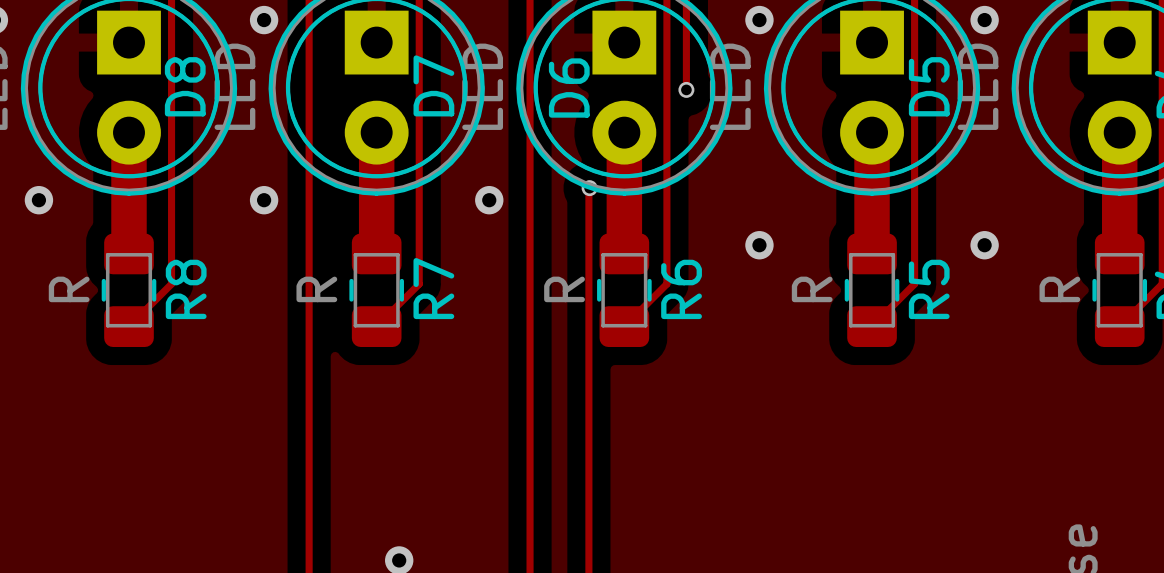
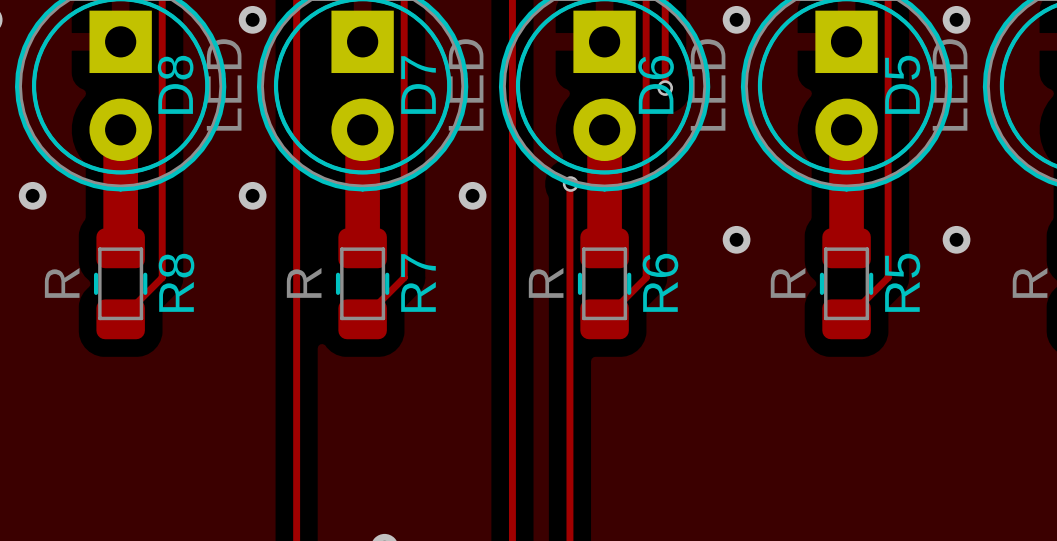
D6 name position: D6 (569, 88) -> D6 (656, 84)

